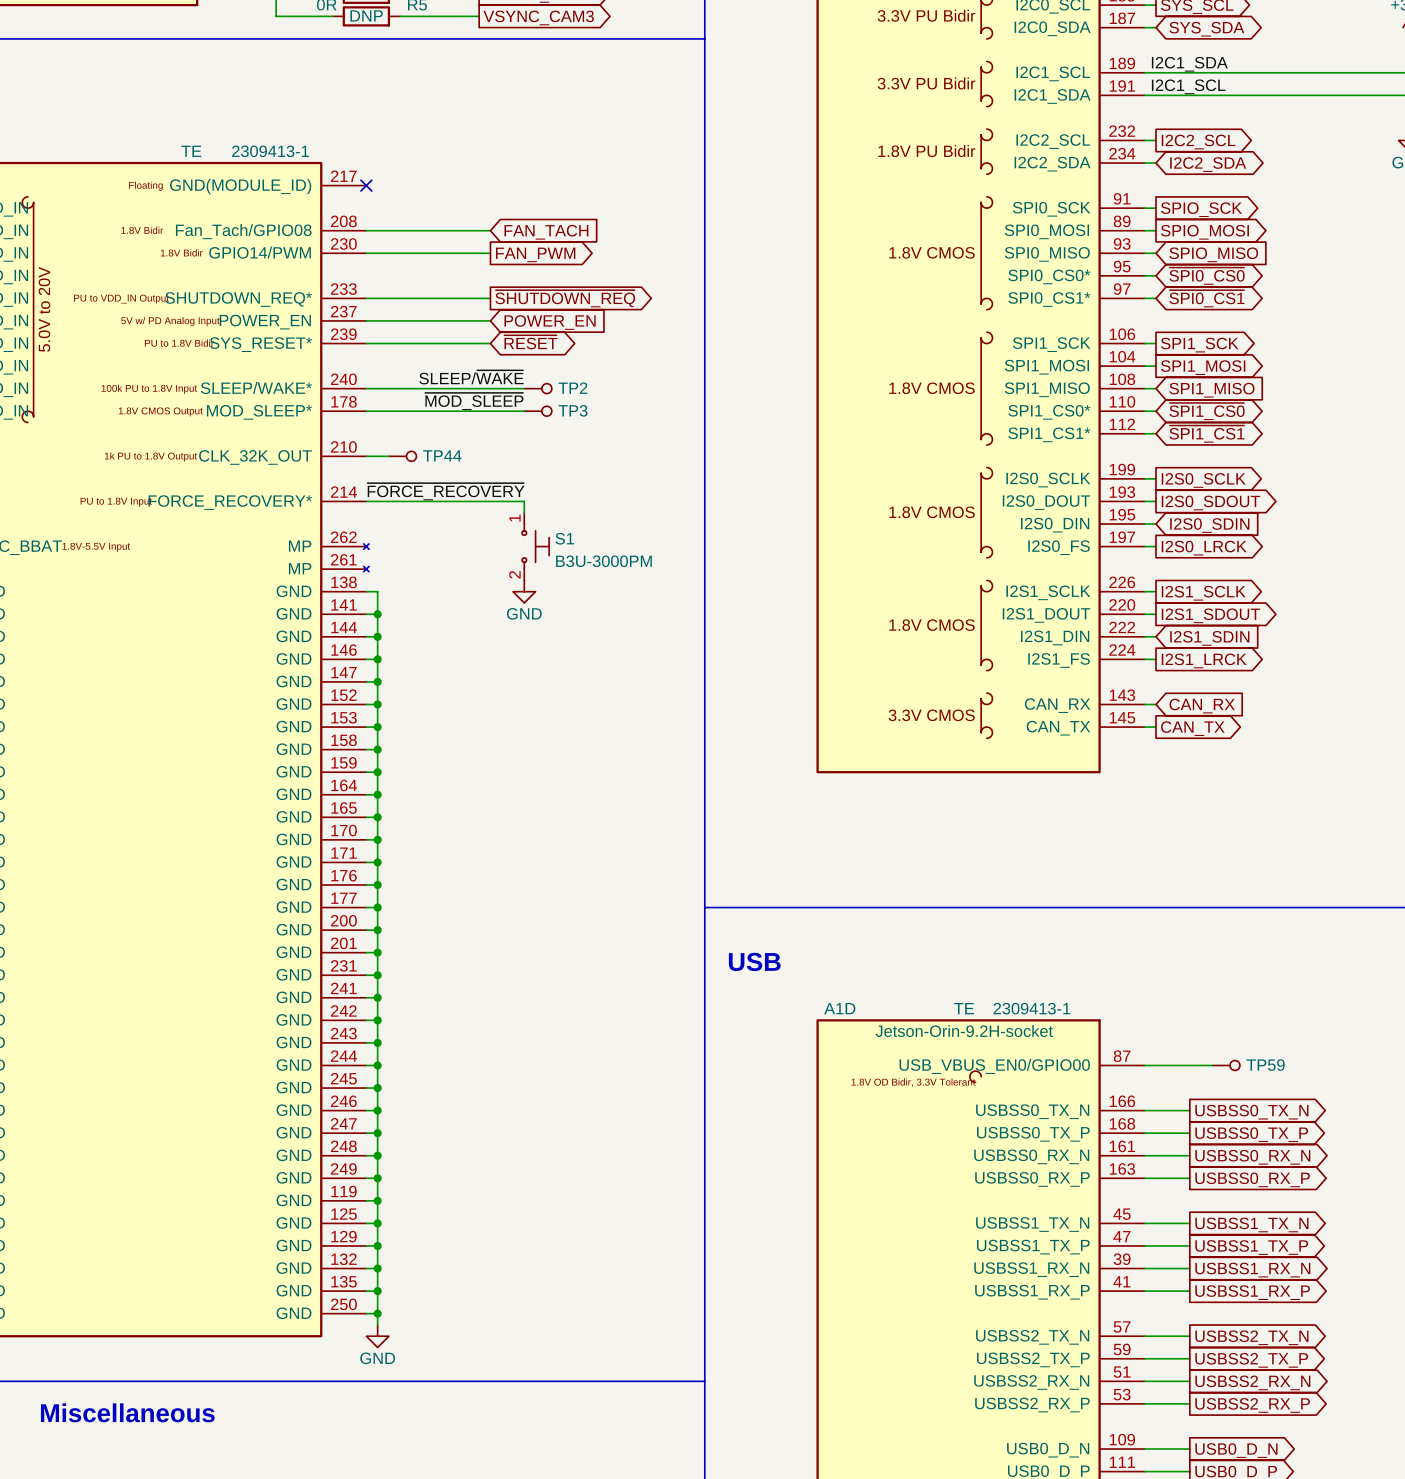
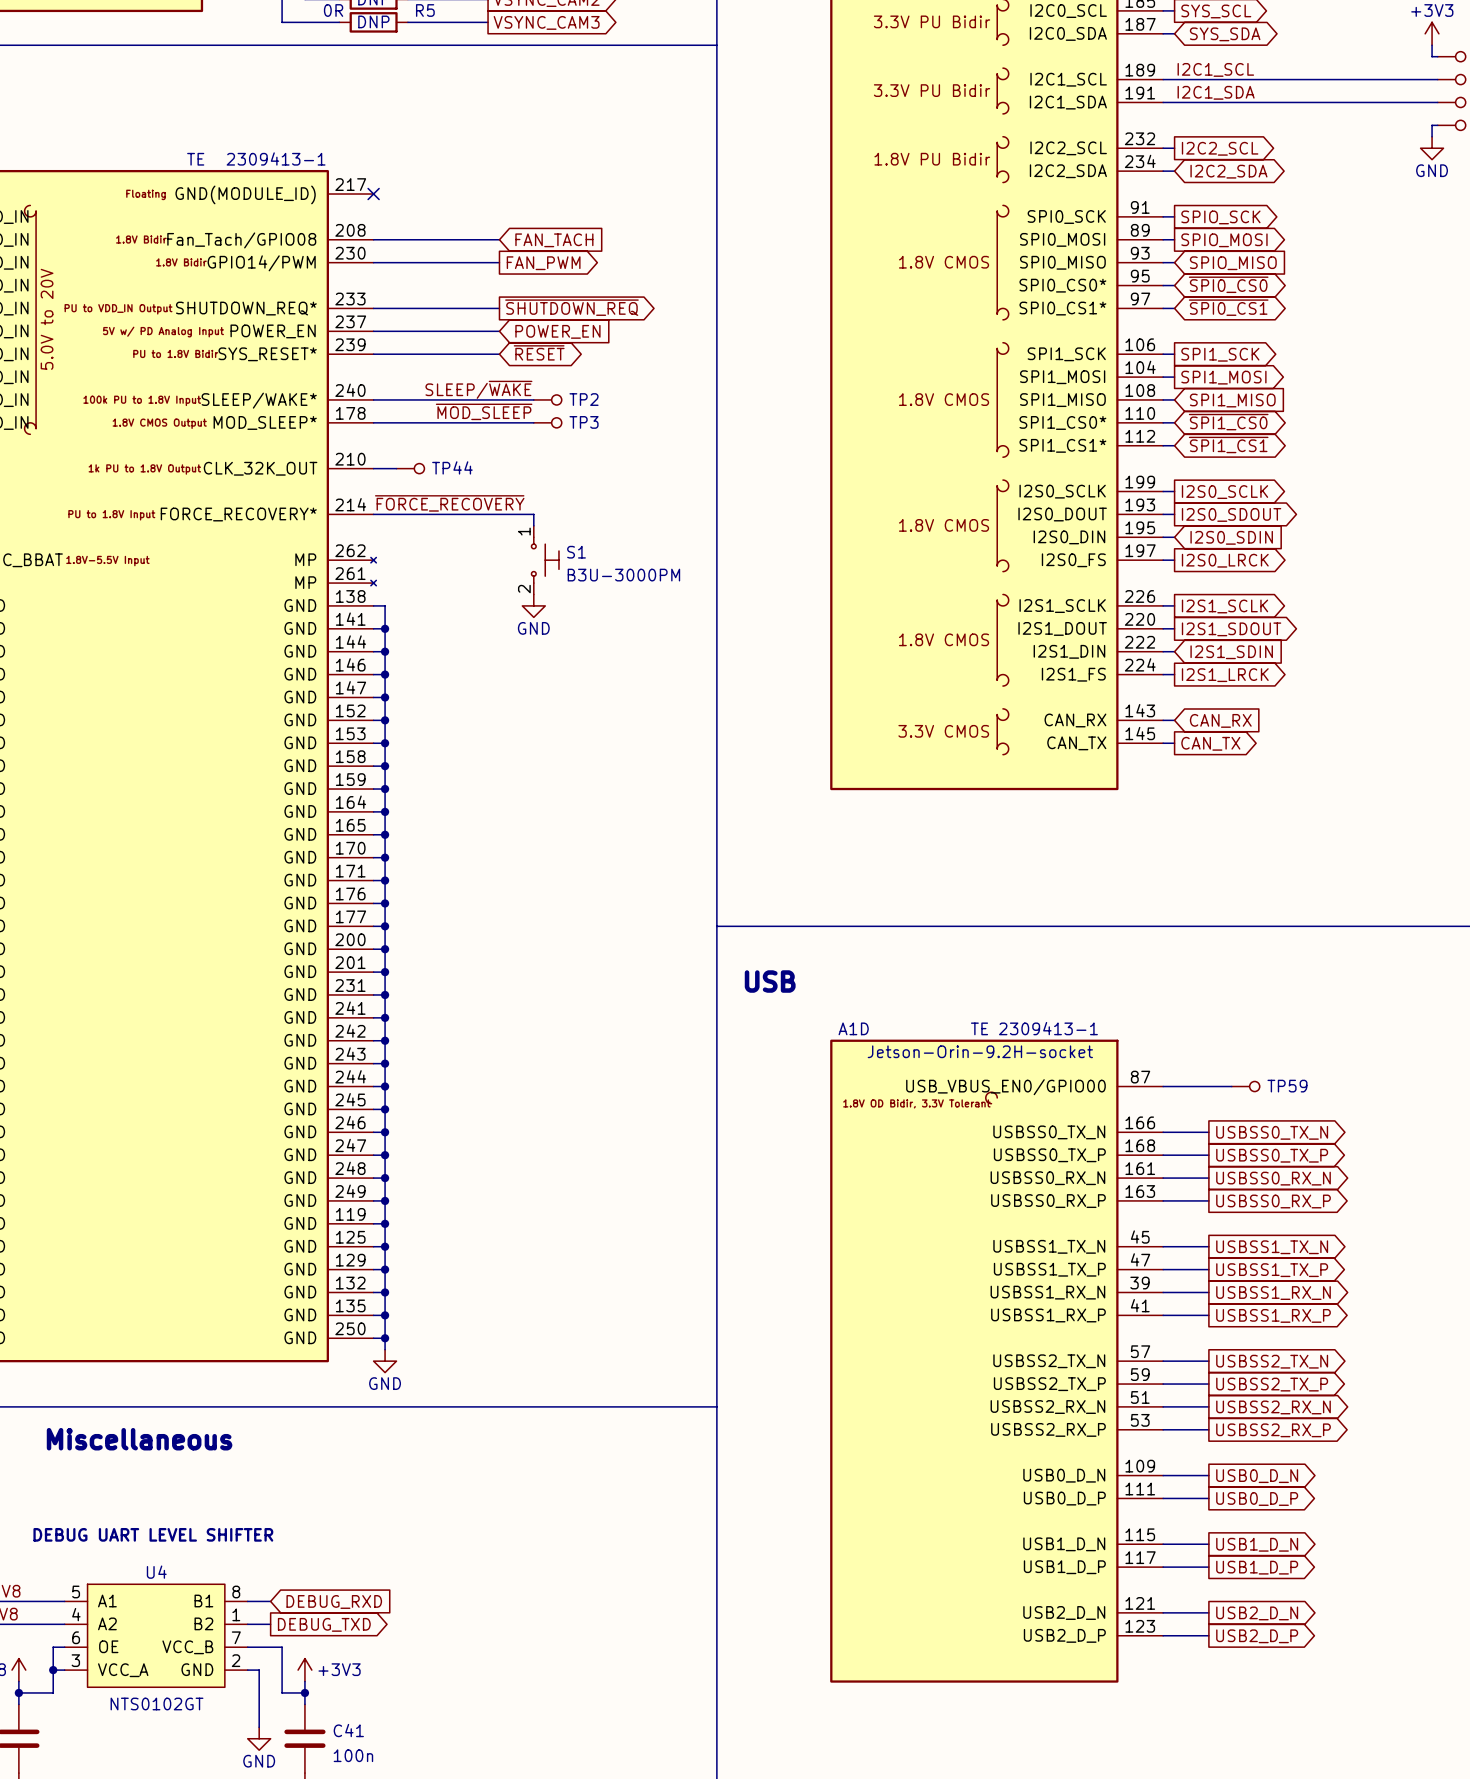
label: I2C1_SDA (1189, 64) -> I2C1_SCL (1215, 69)
label: I2C1_SCL (1188, 86) -> I2C1_SDA (1216, 92)

